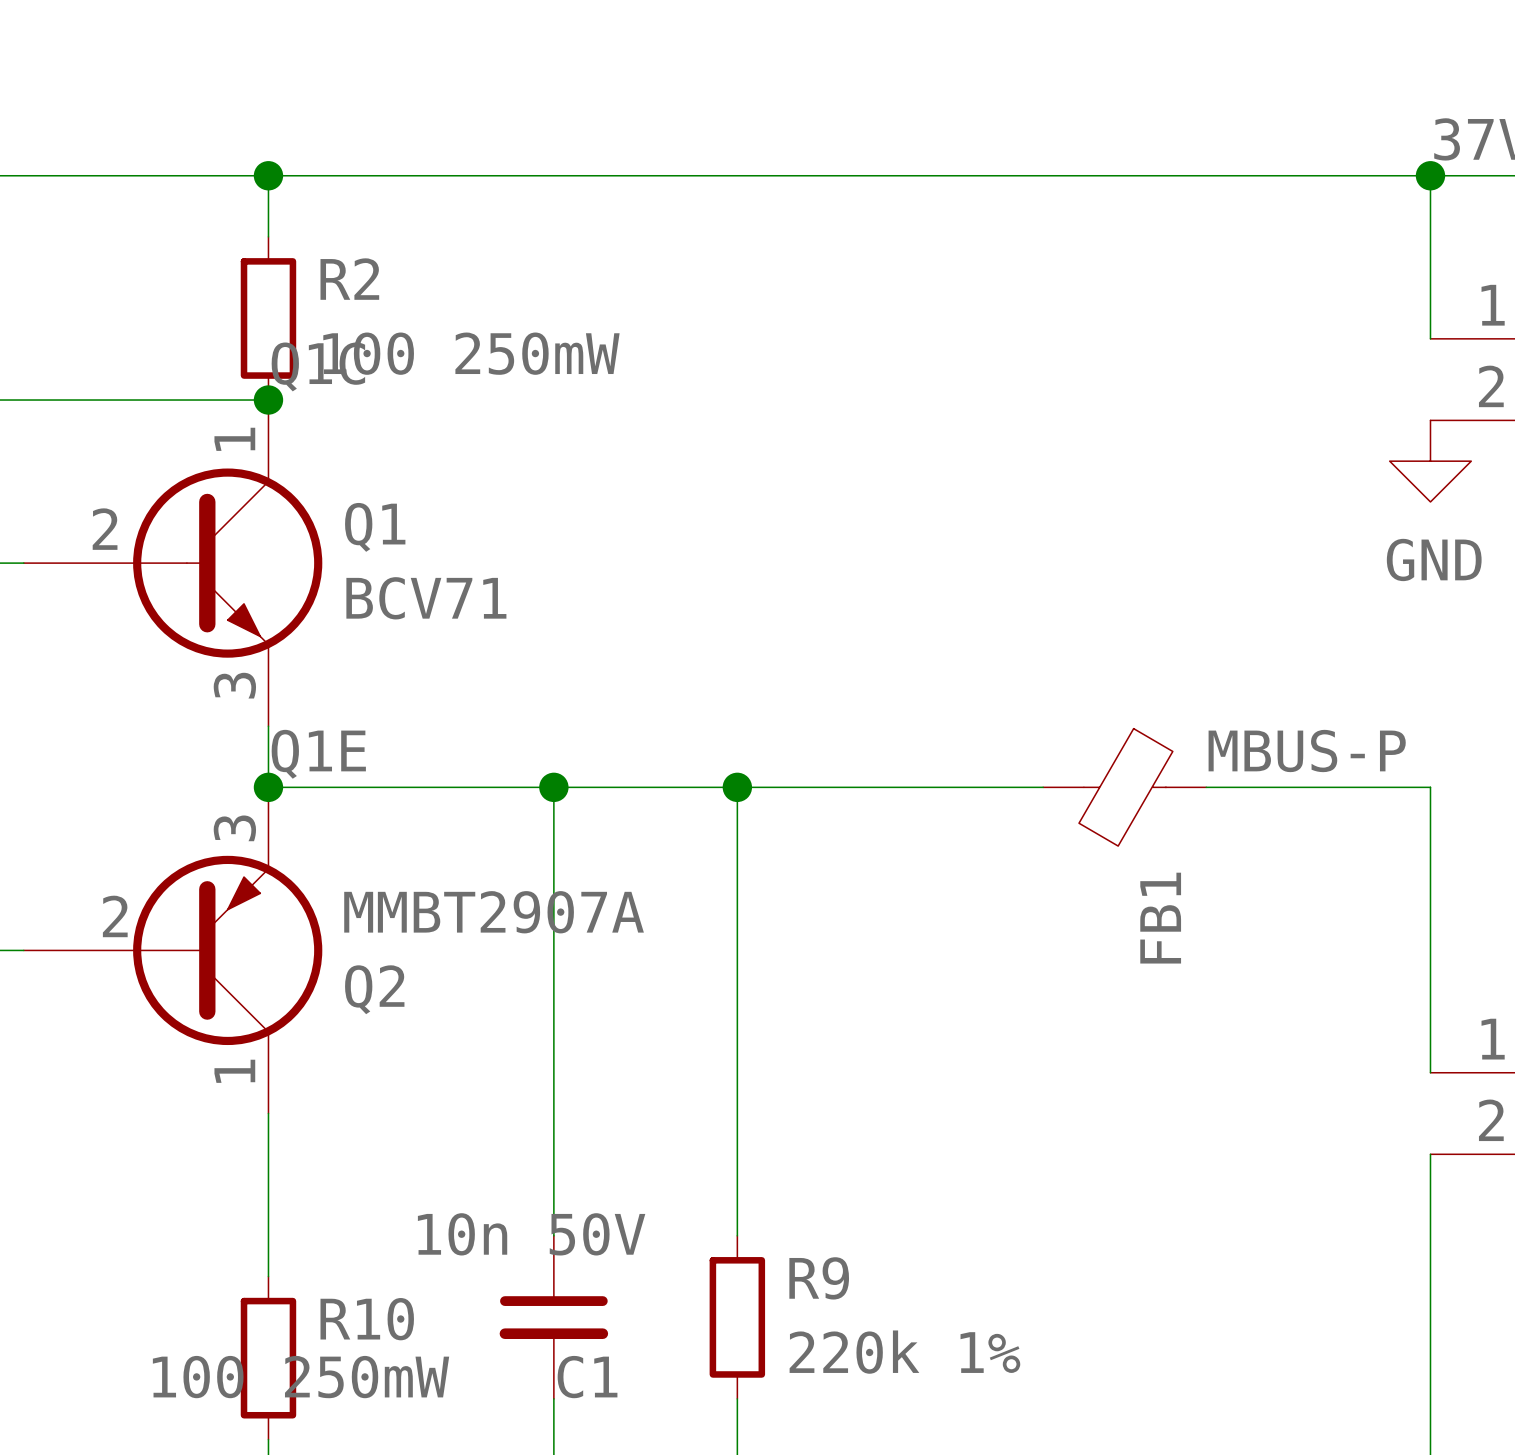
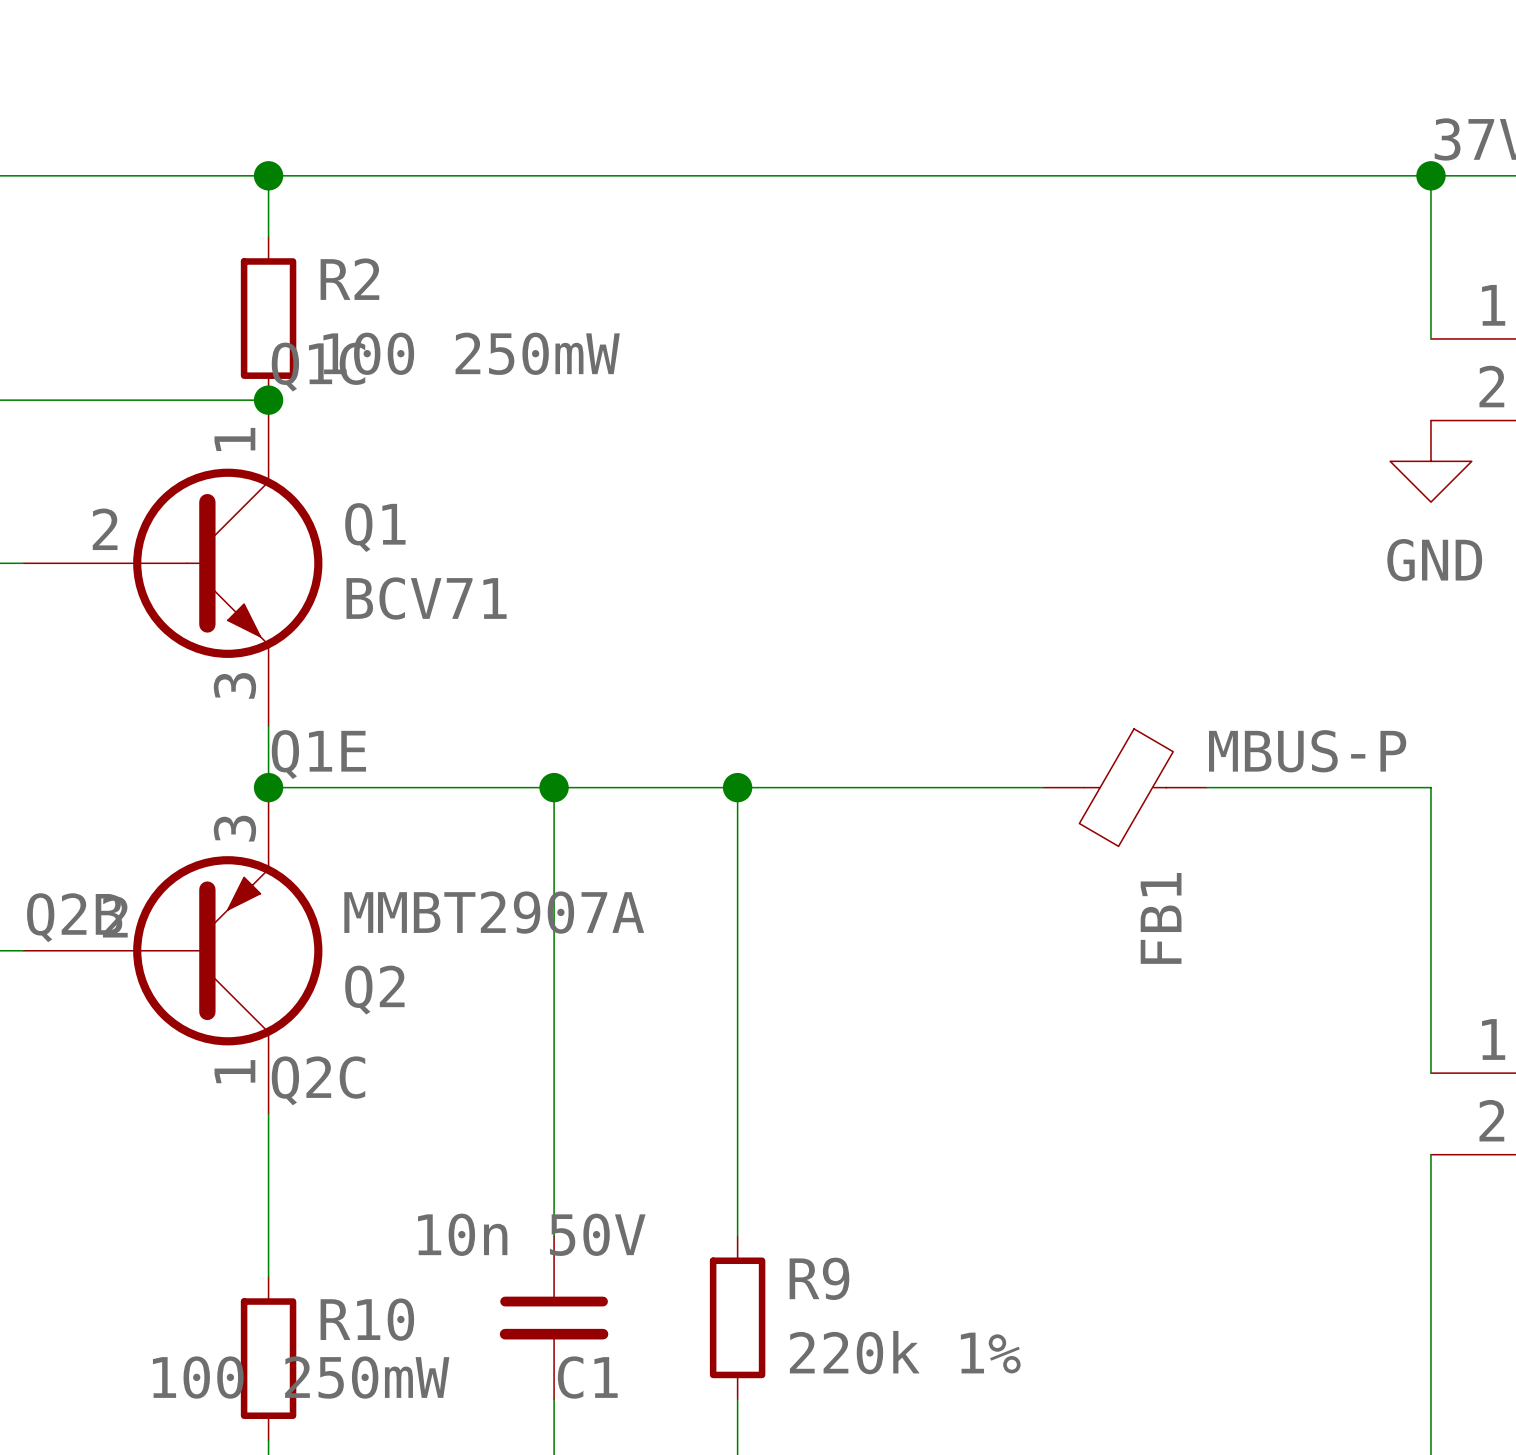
label: none -> Q2B (74, 917)
label: none -> Q2C (318, 1080)

